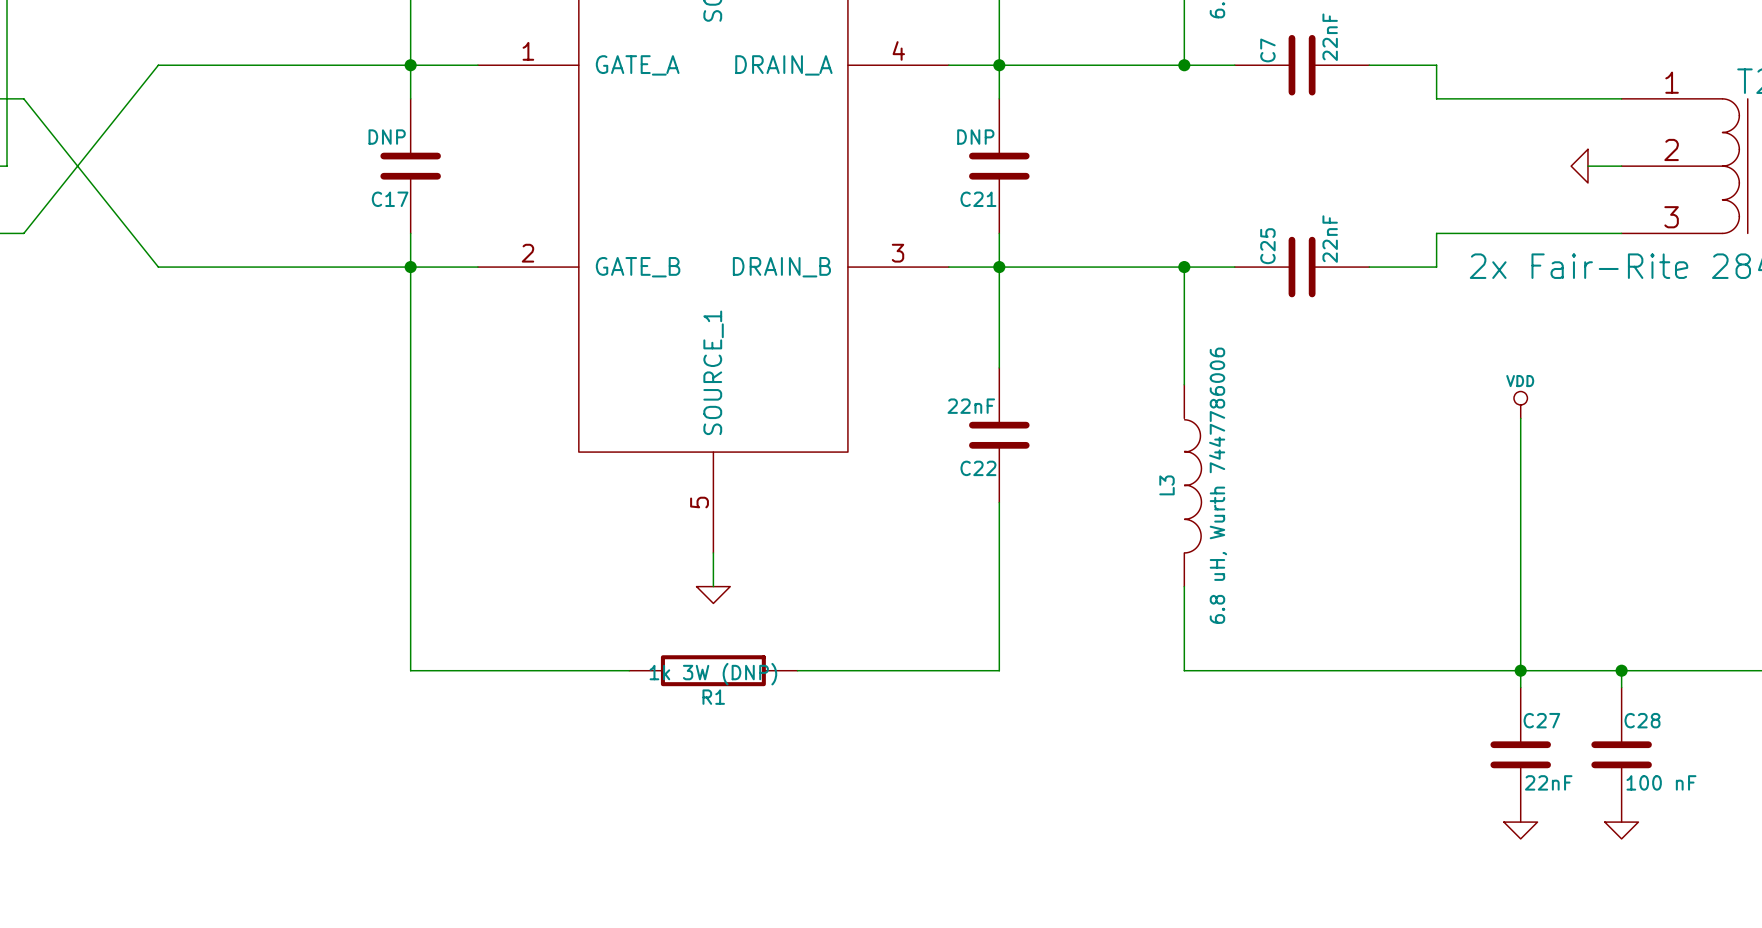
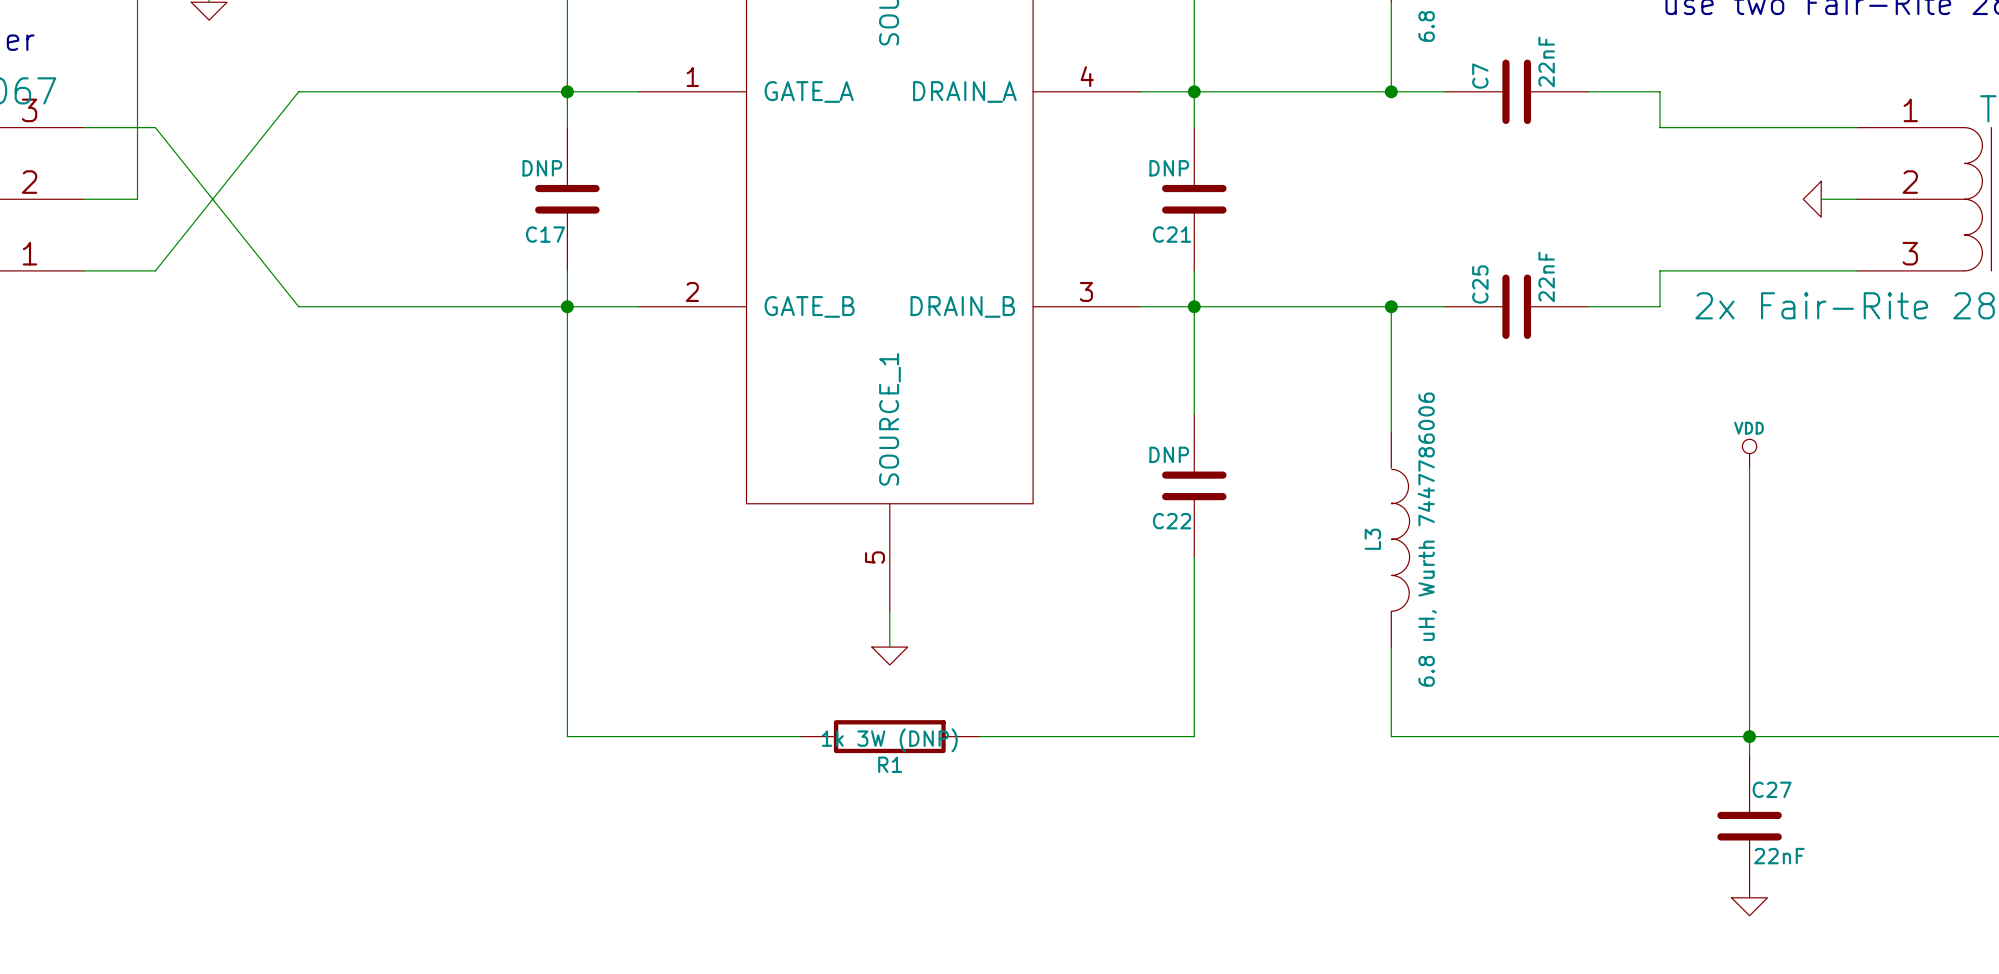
C22 value: 22nF (971, 406) -> DNP (1169, 454)
wire: (1621, 670) (1621, 687) -> none
junction: (1621, 670) -> none
C28: 100 nF (1621, 754) -> none
power symbol: (1621, 830) -> none

